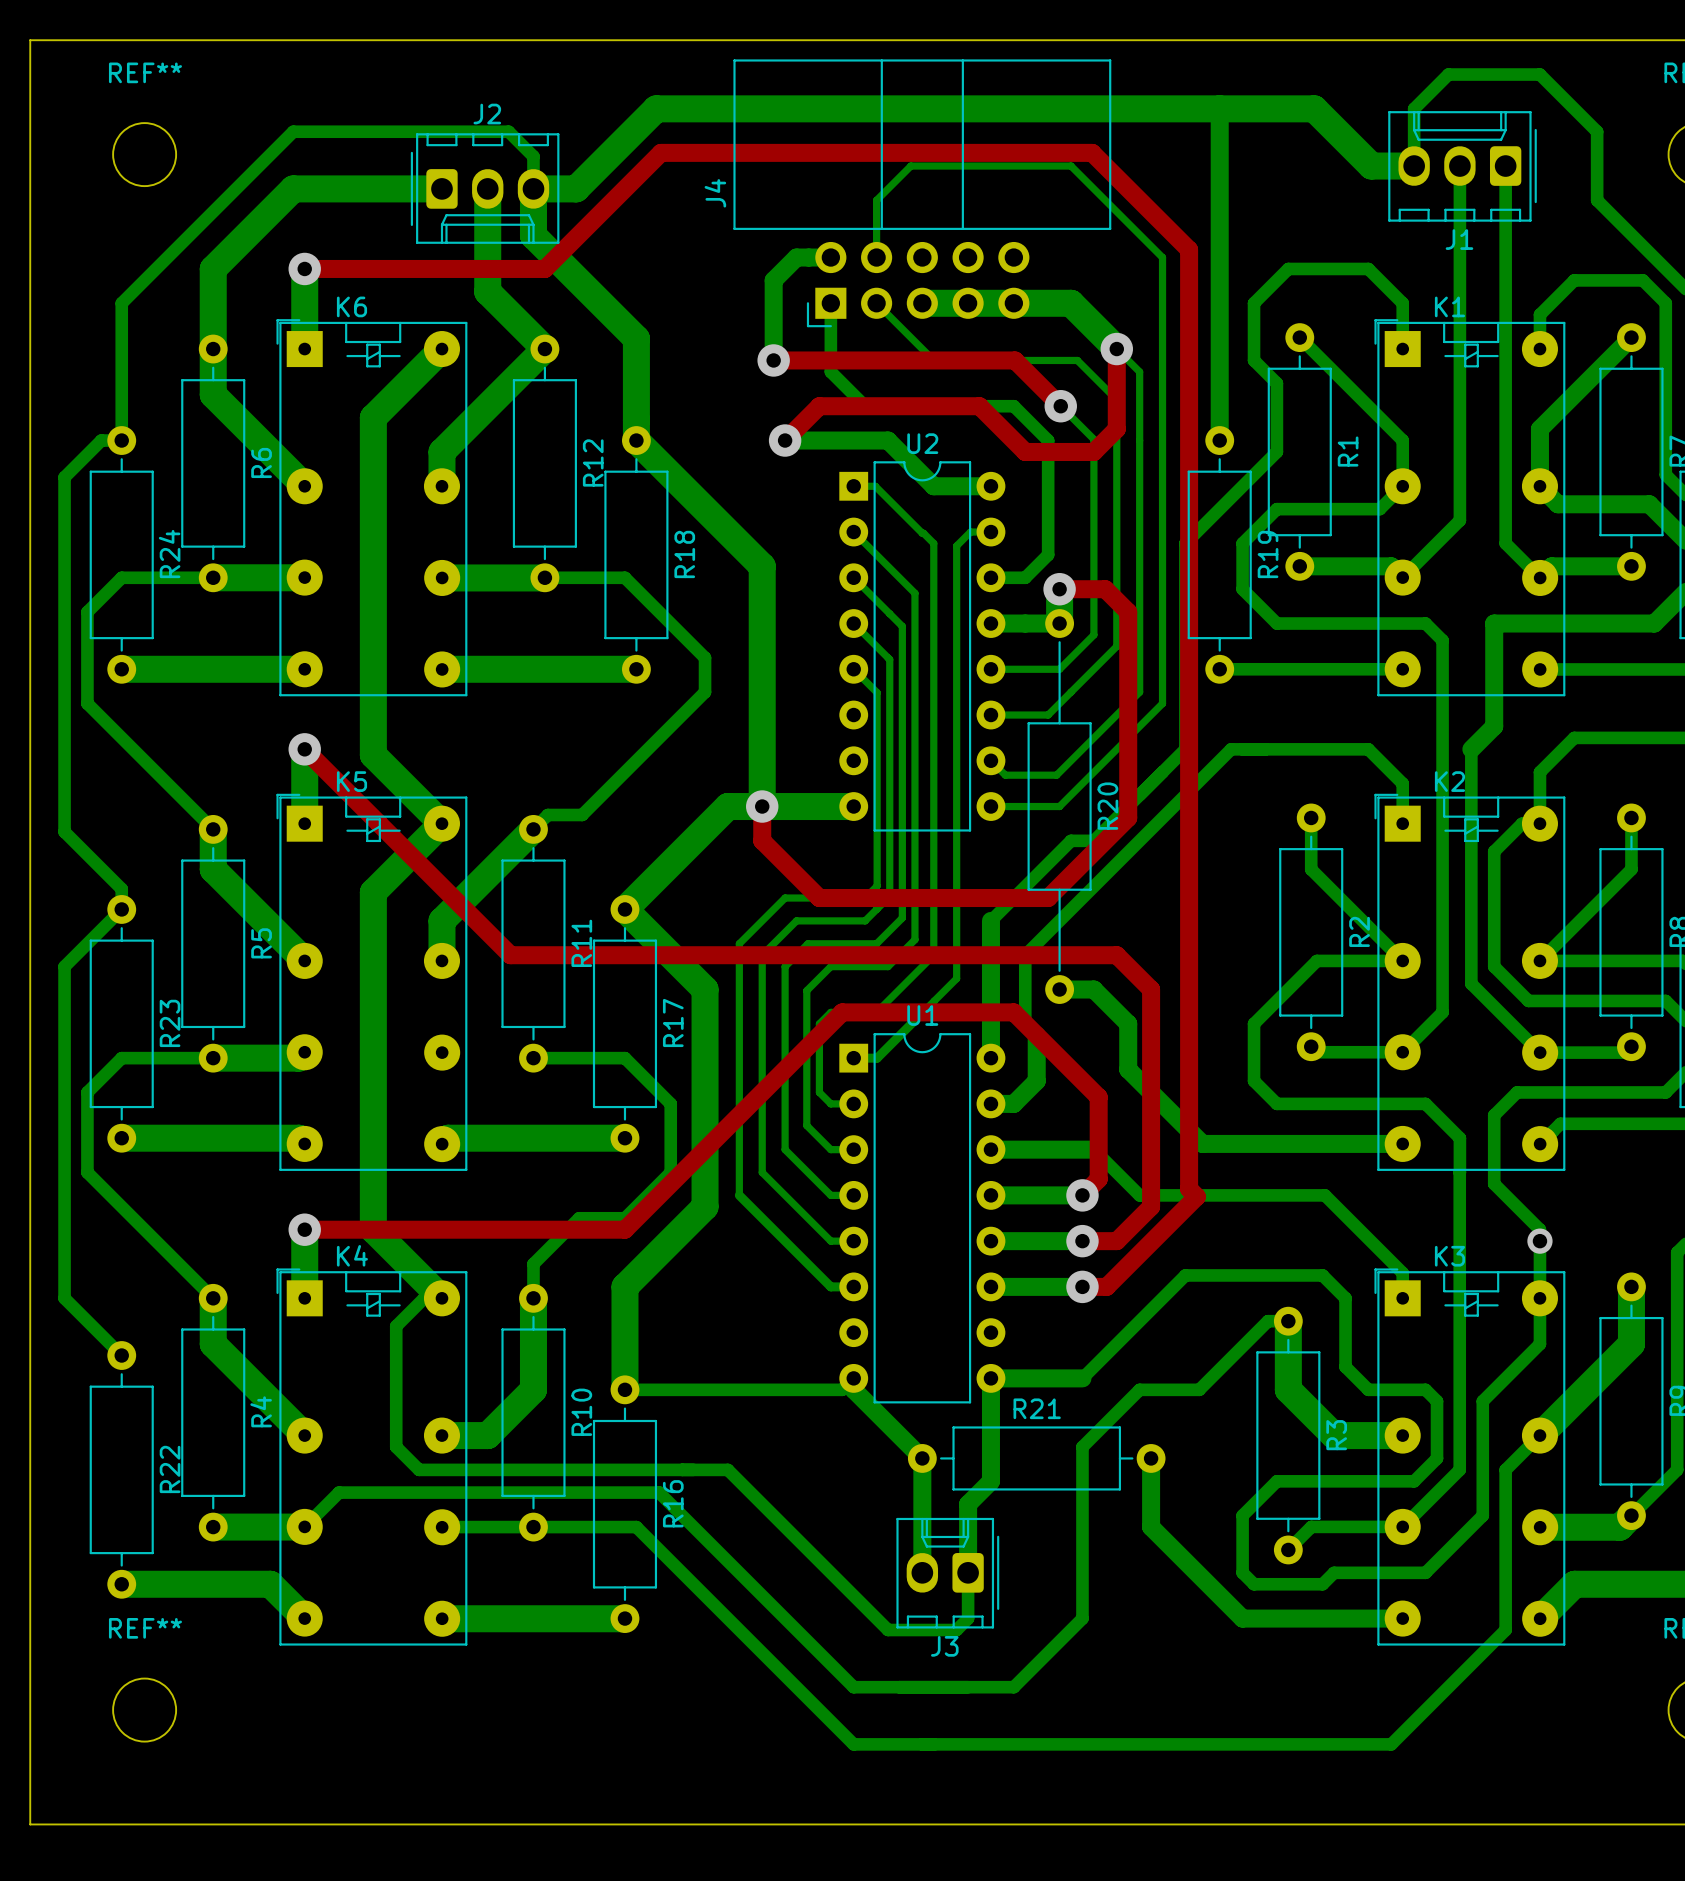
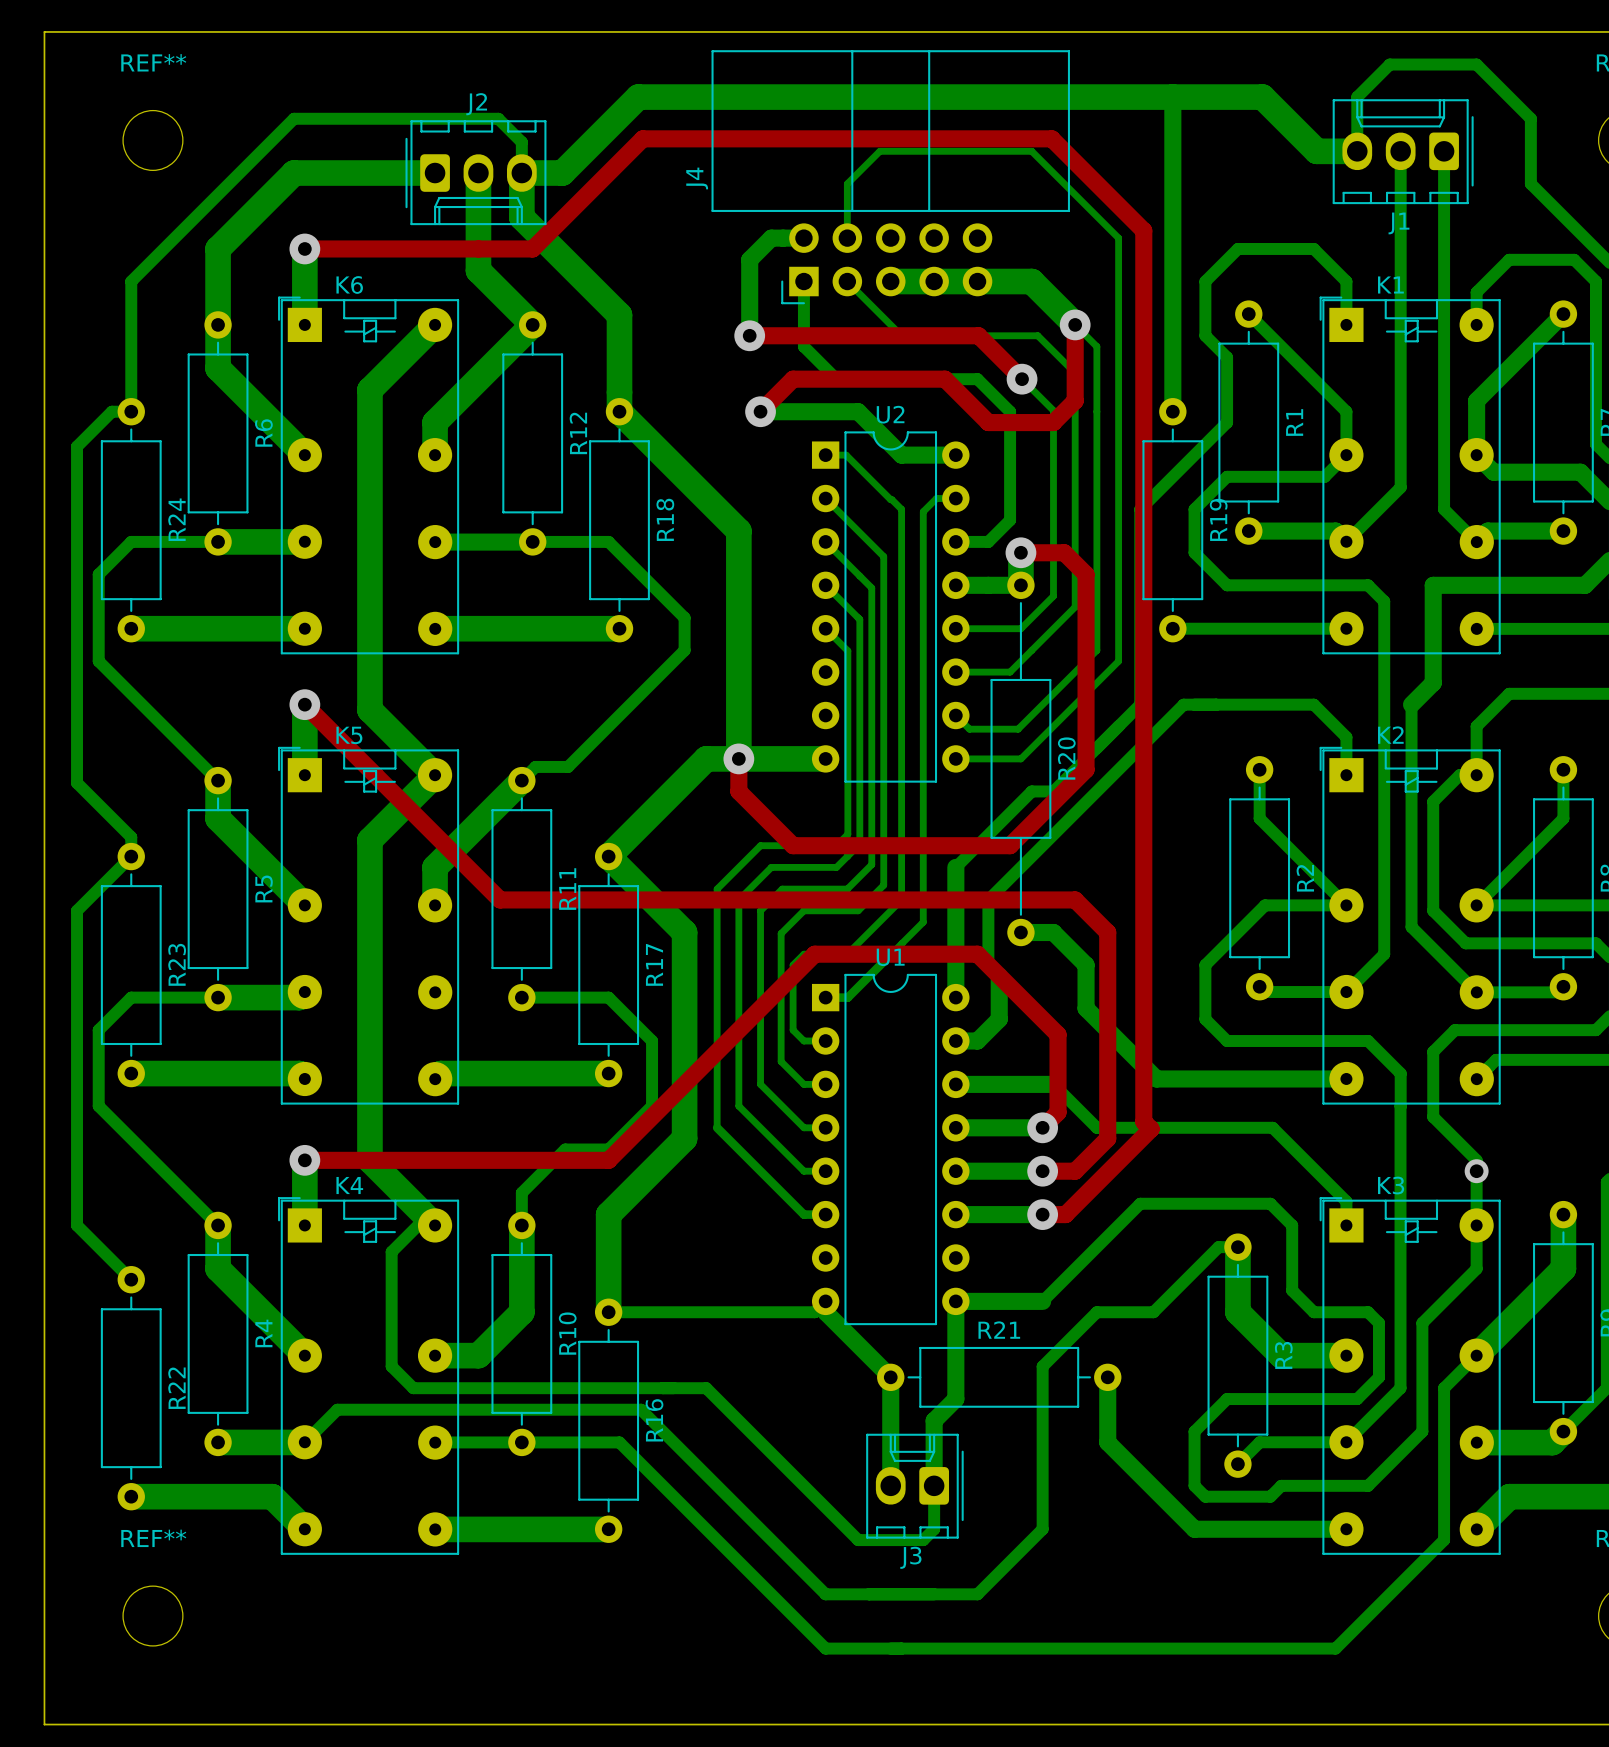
bottom track width: thick (442, 577) (544, 577) -> thin (435, 542) (532, 542)

